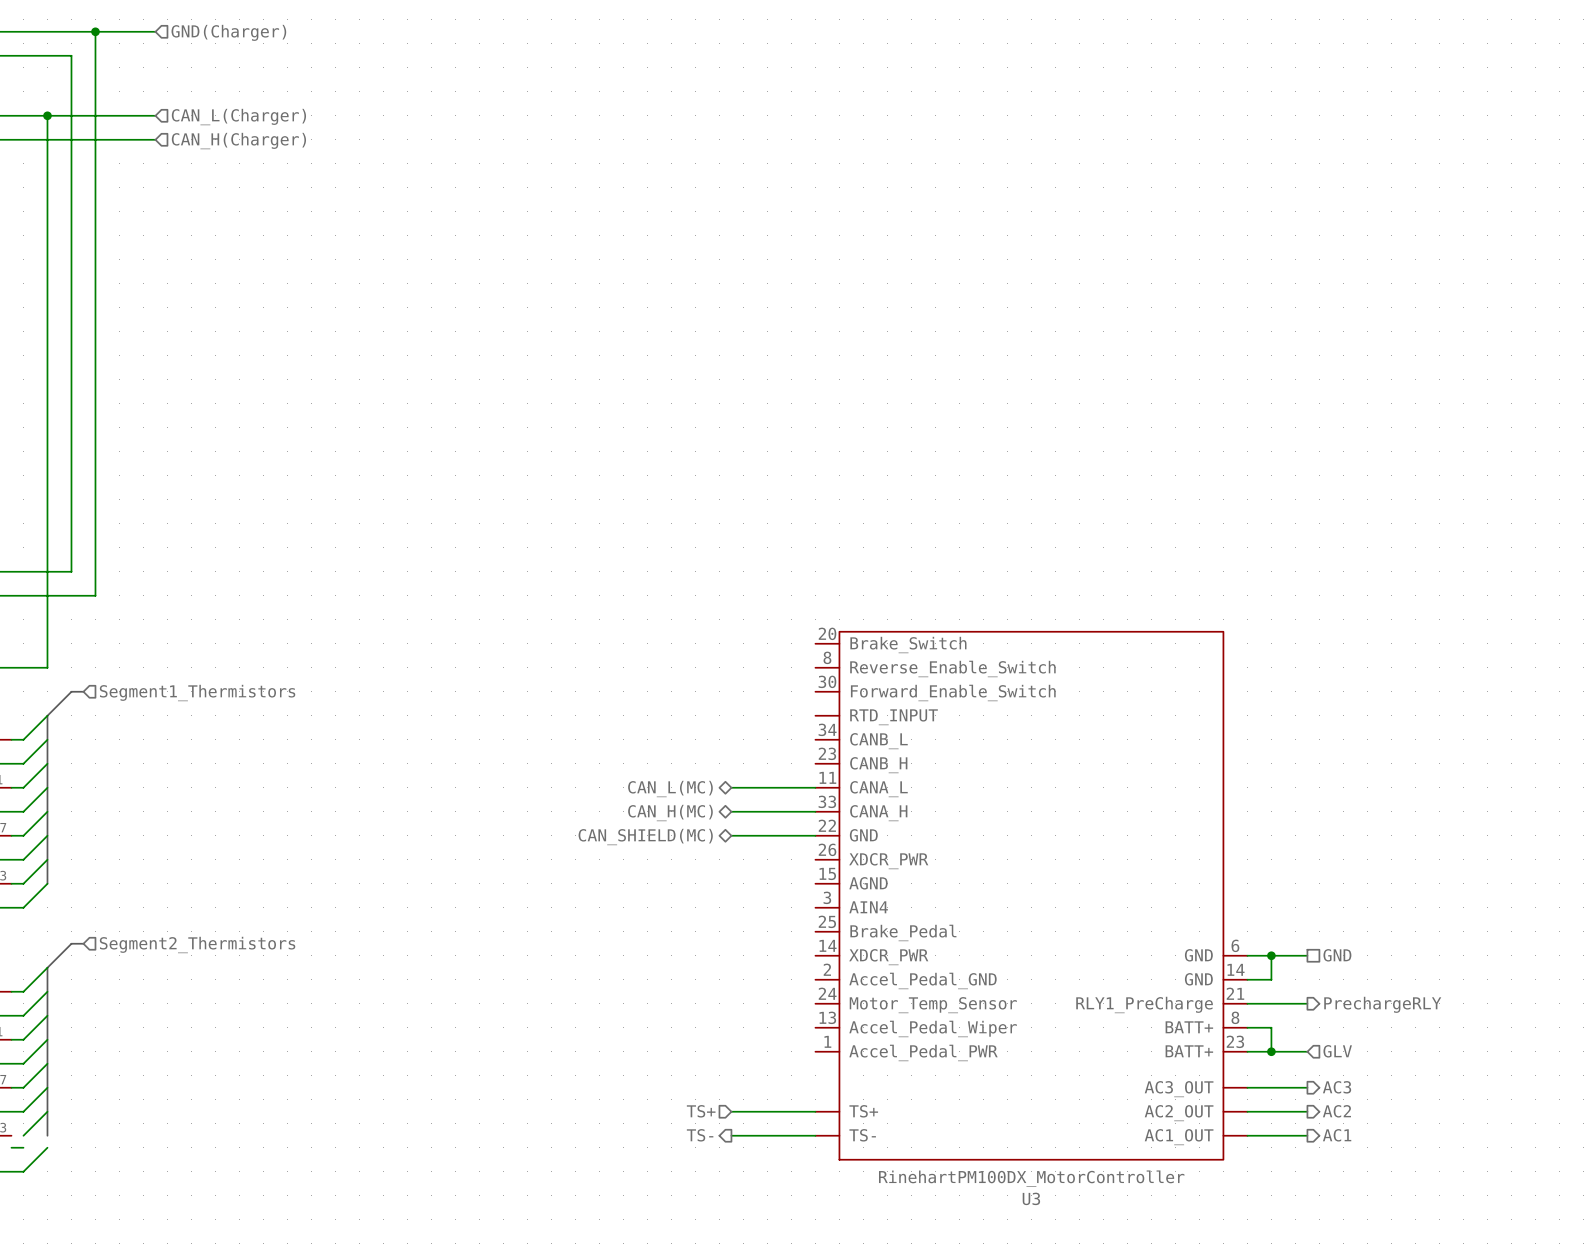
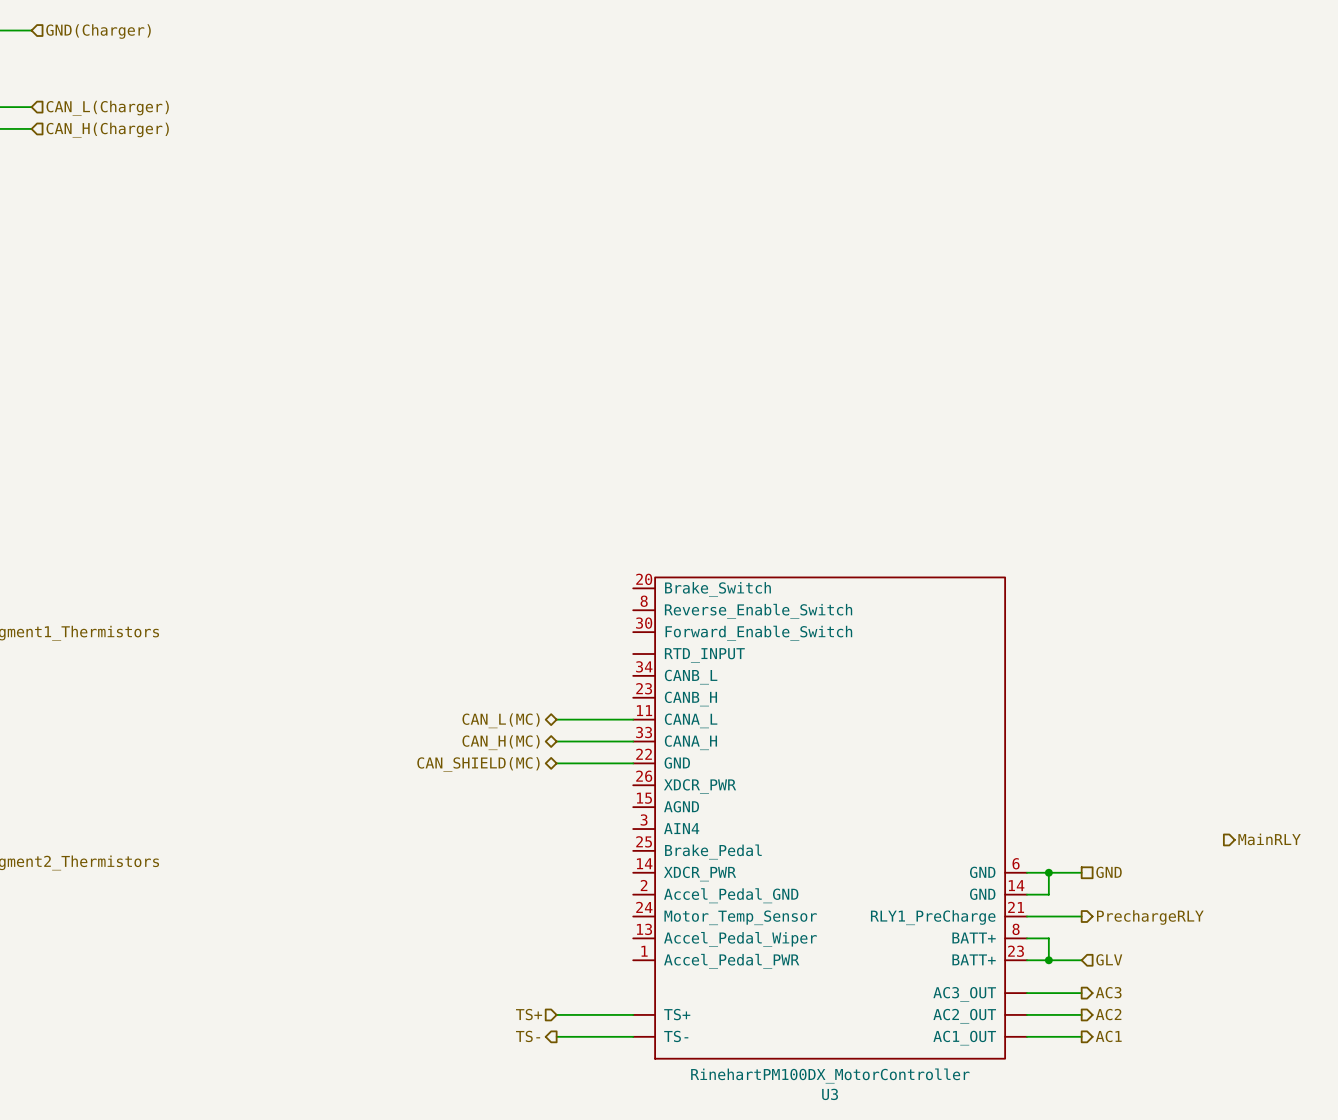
hierarchical label: none -> MainRLY (1269, 839)

